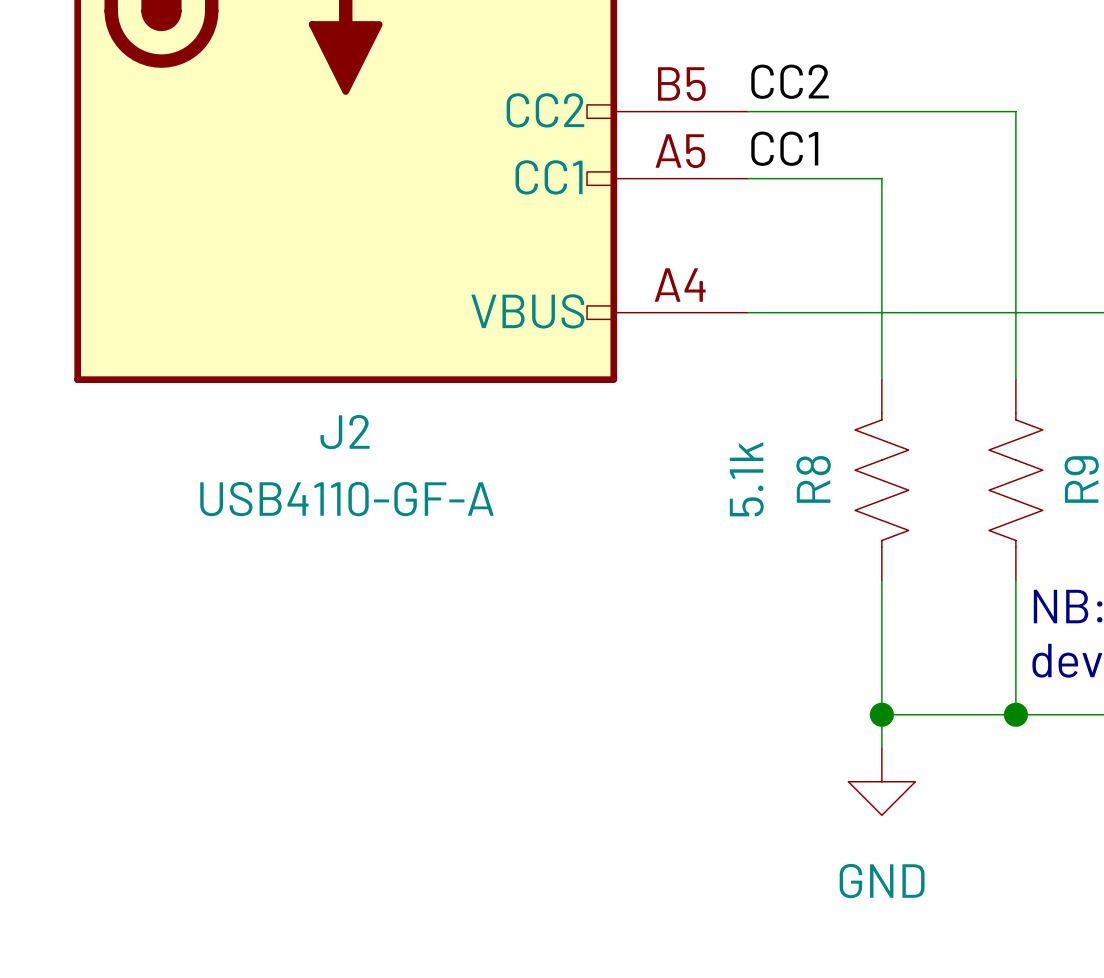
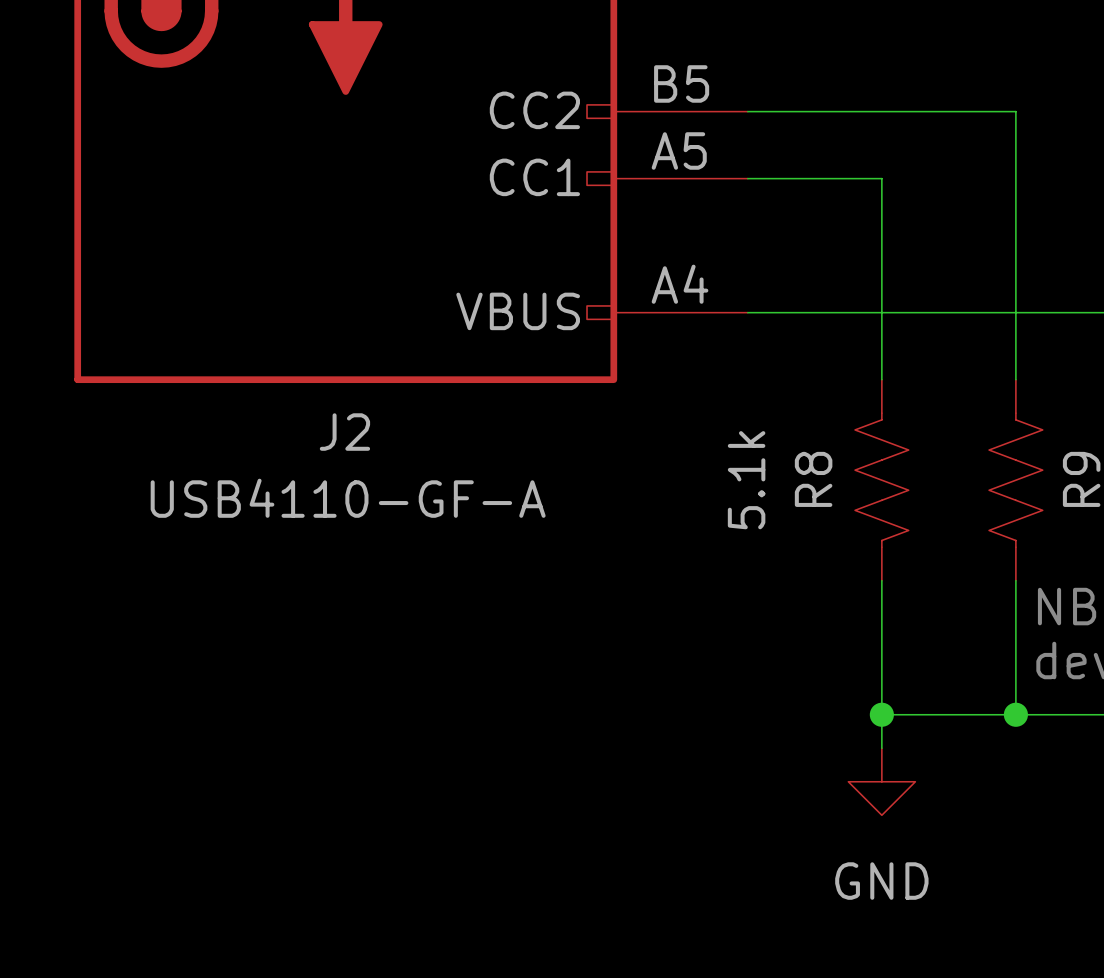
label: CC2 (790, 81) -> none
label: CC1 (784, 148) -> none

